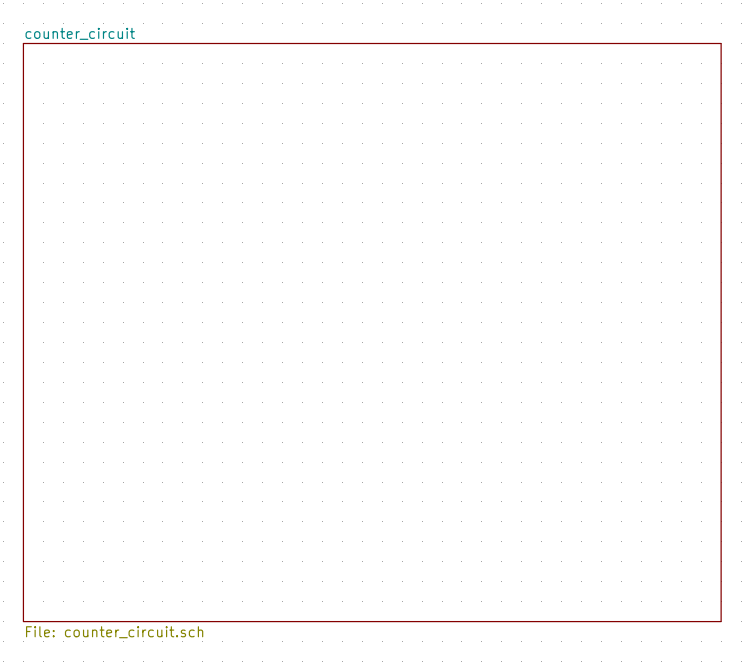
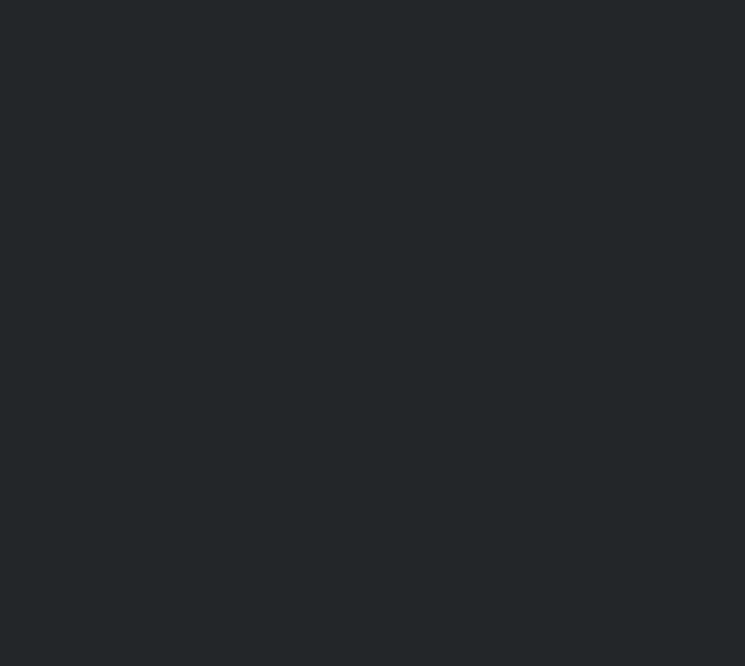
sheet counter_circuit: File: counter_circuit.sch (372, 332) -> none

